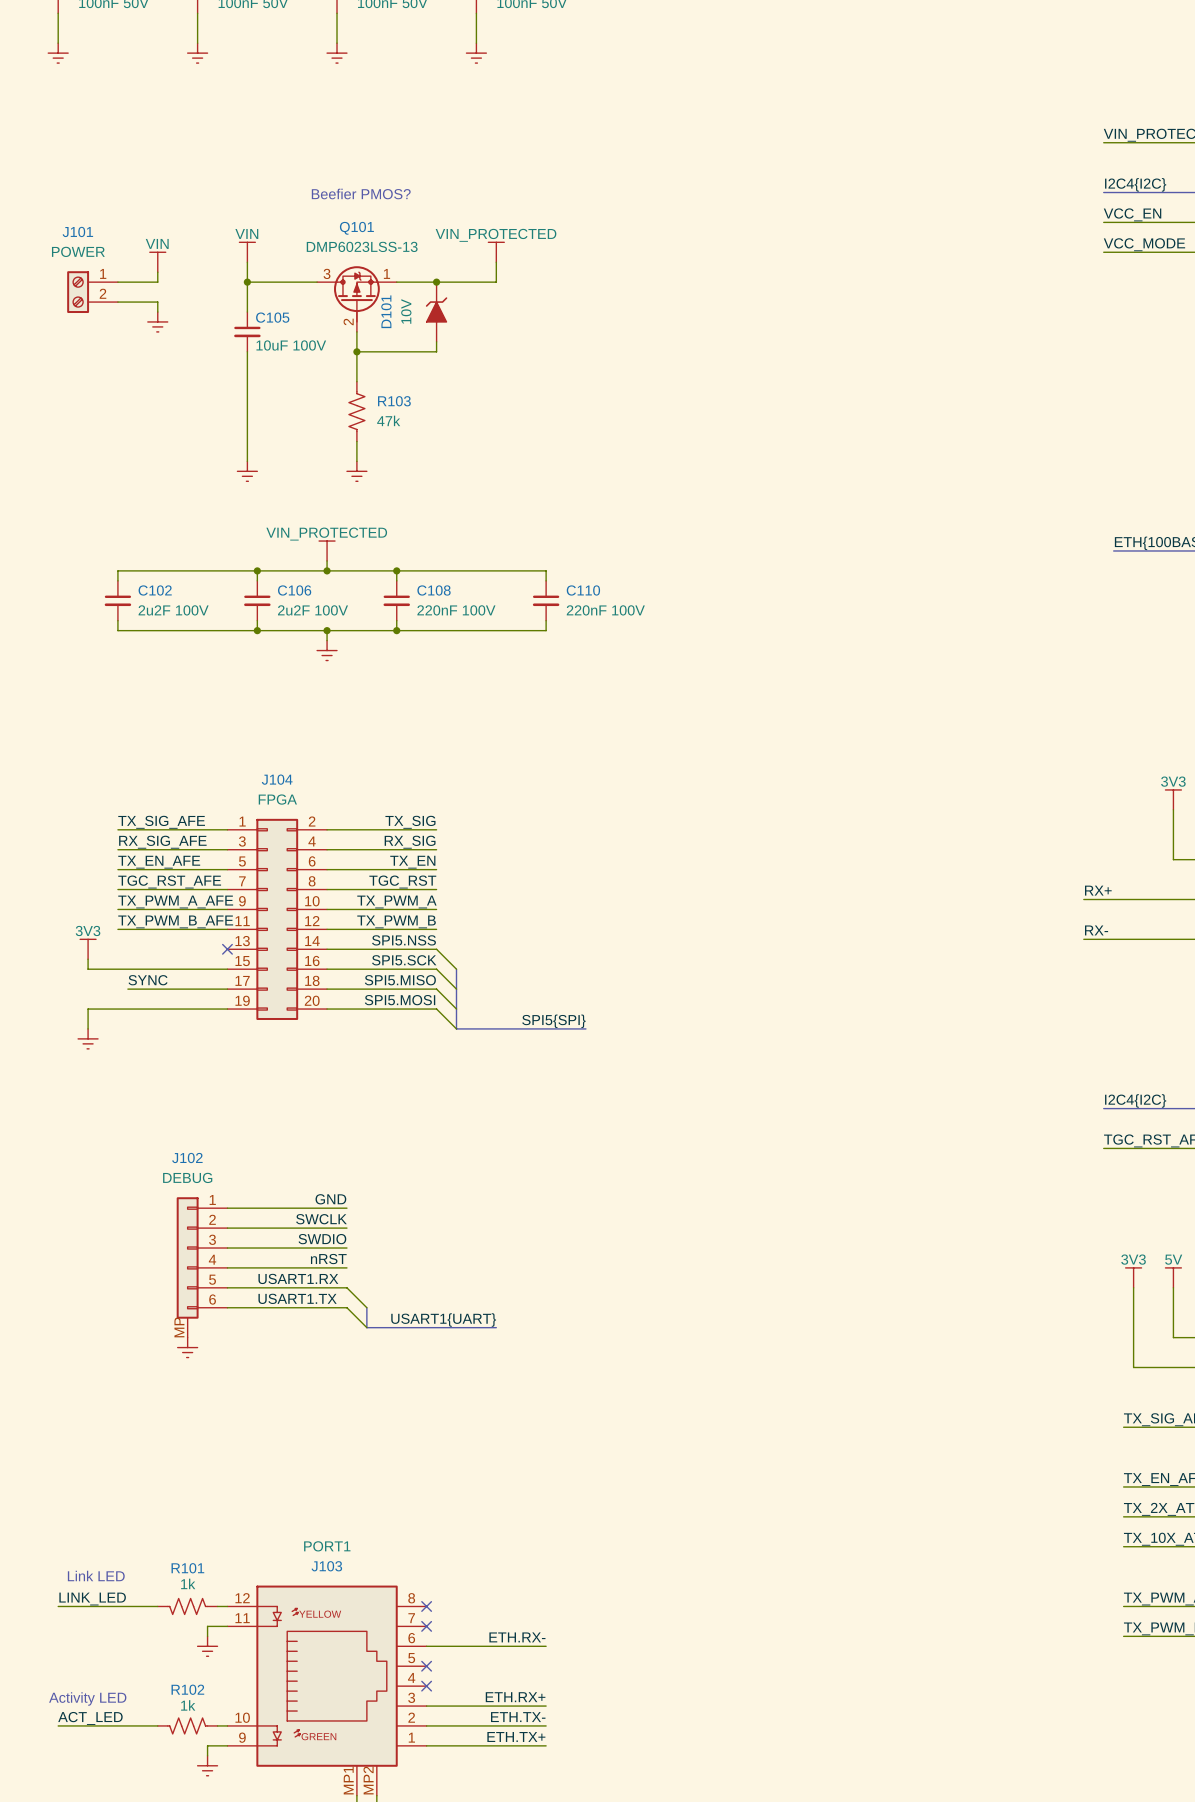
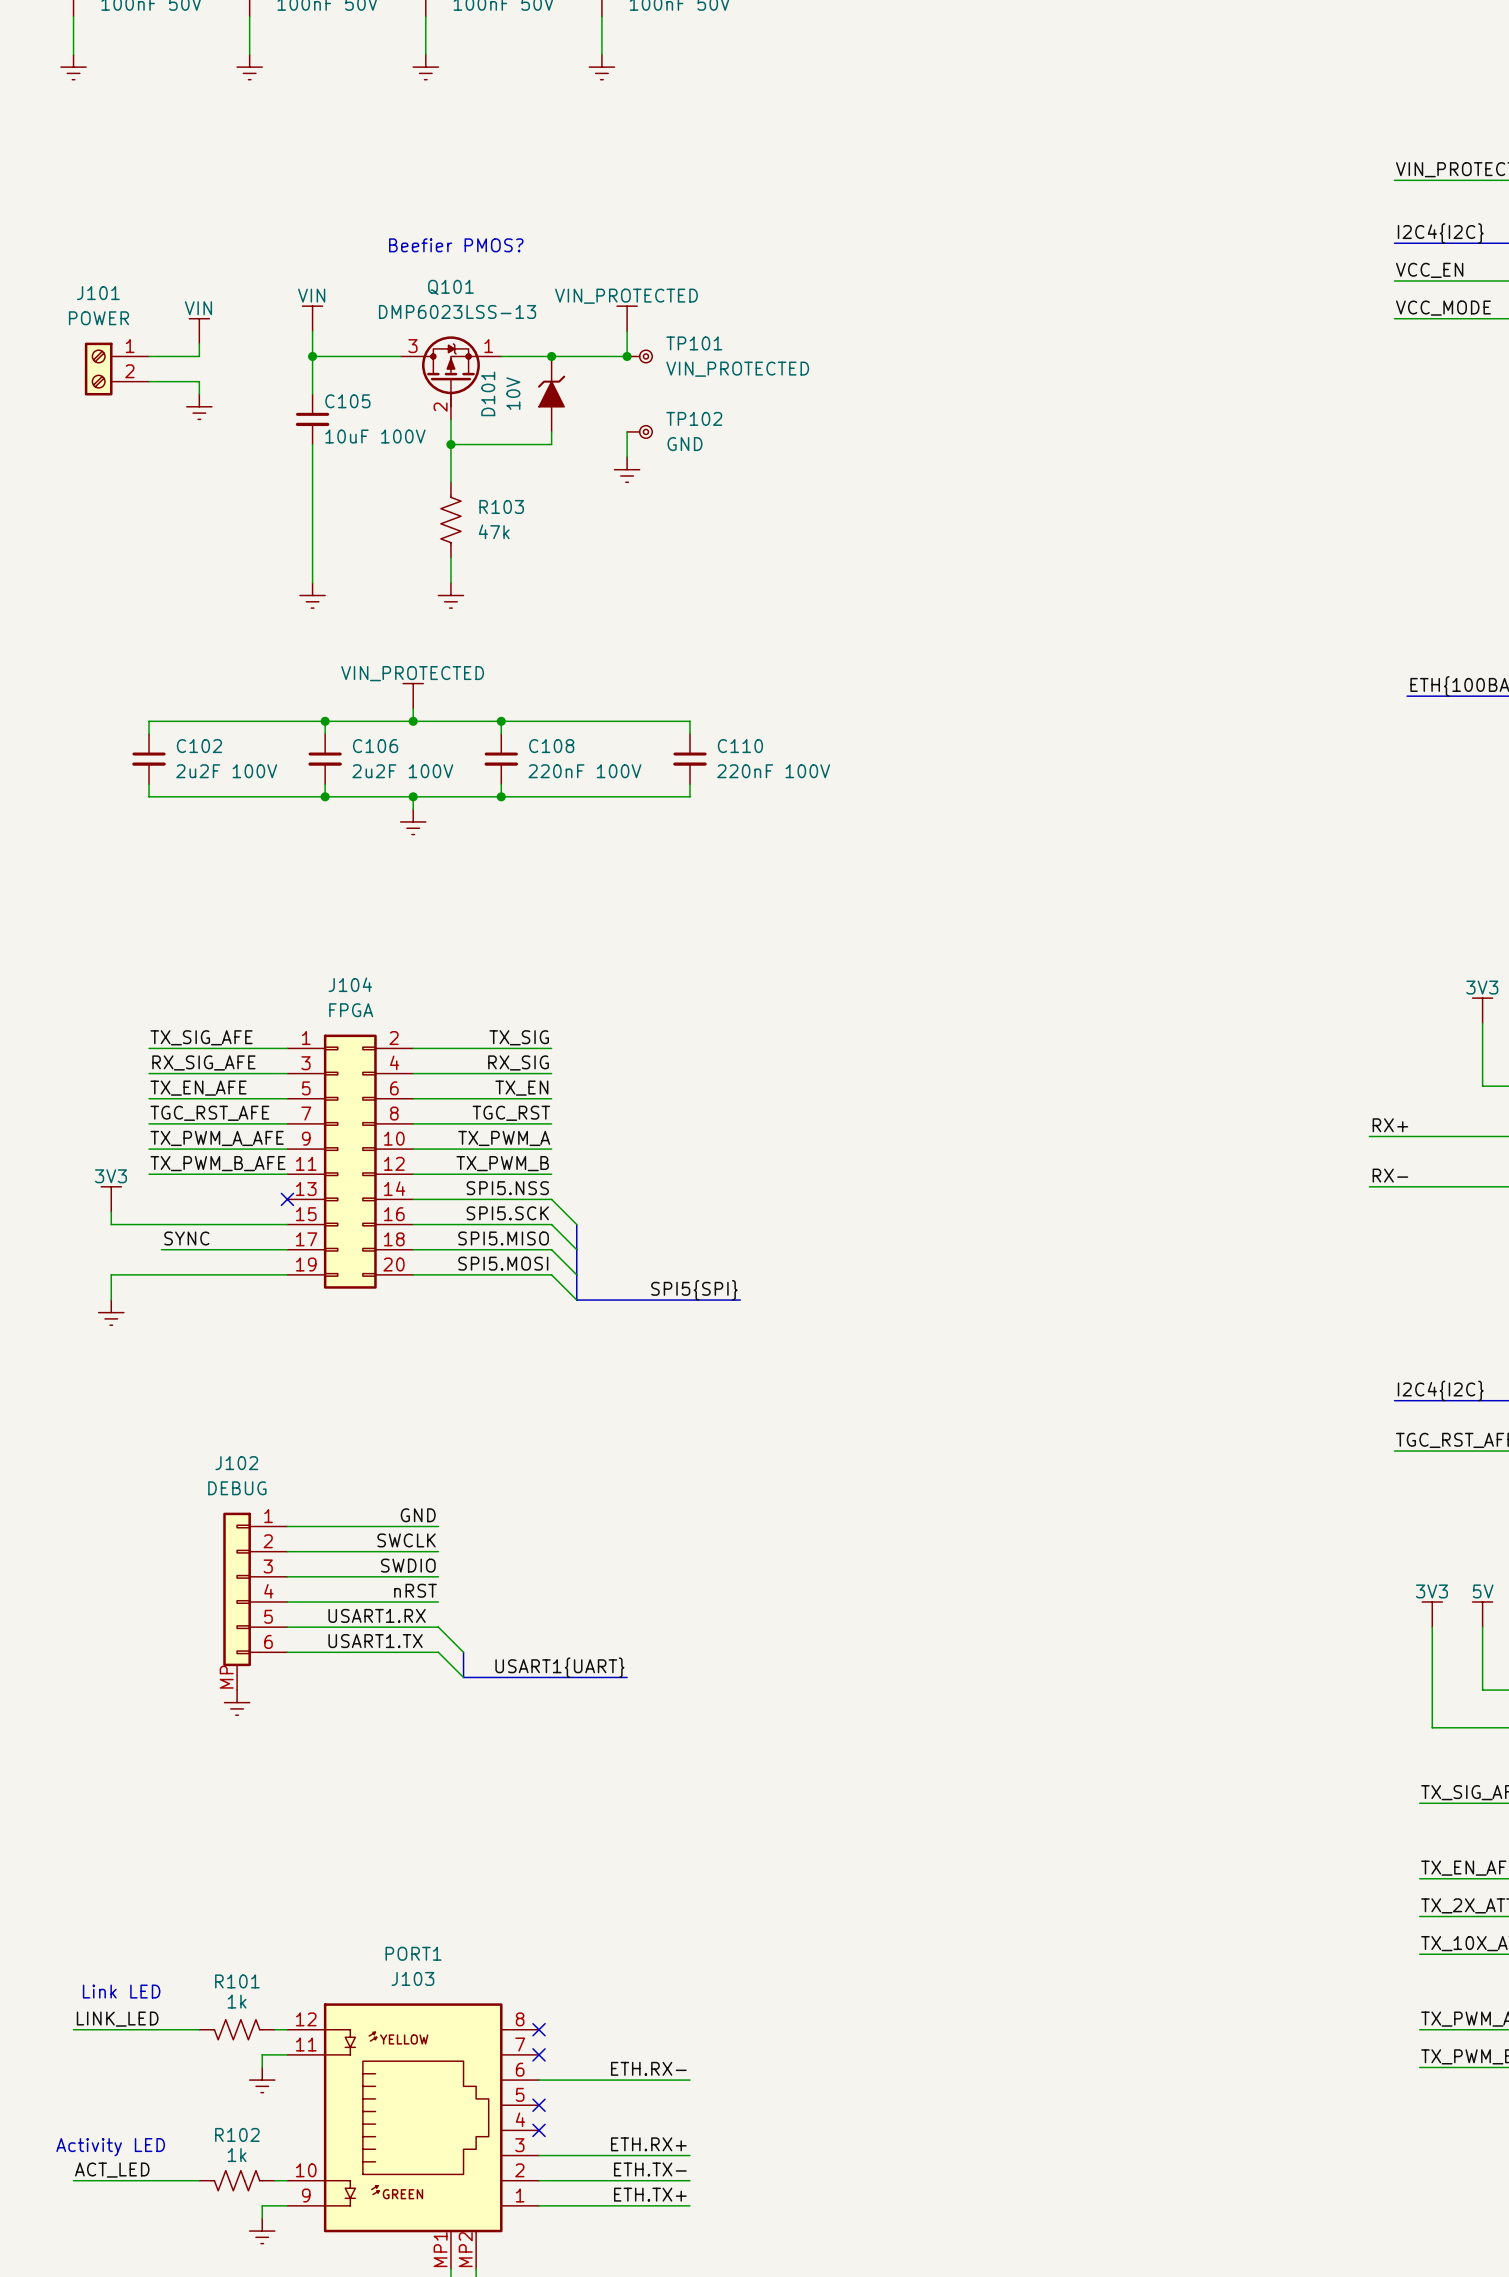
junction: none -> (627, 356)
TP101: none -> VIN_PROTECTED (639, 356)
wire: none -> (627, 431) (627, 457)
TP102: none -> GND (639, 431)
power symbol: none -> (627, 469)

